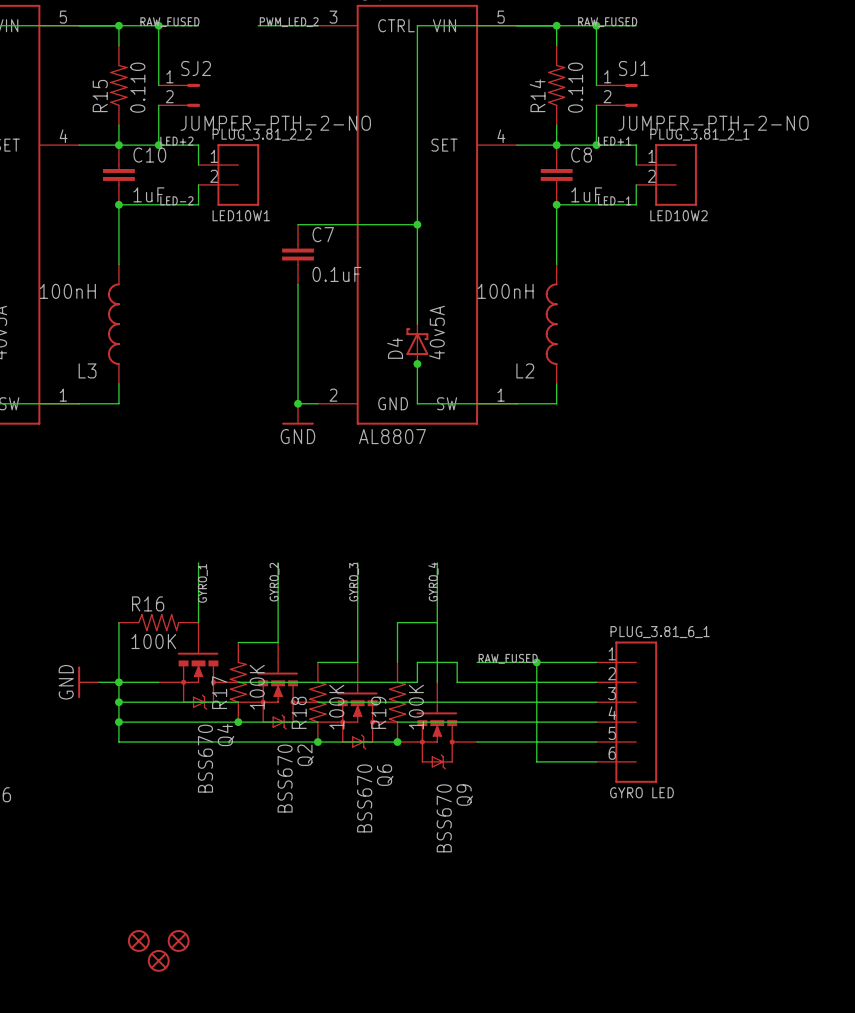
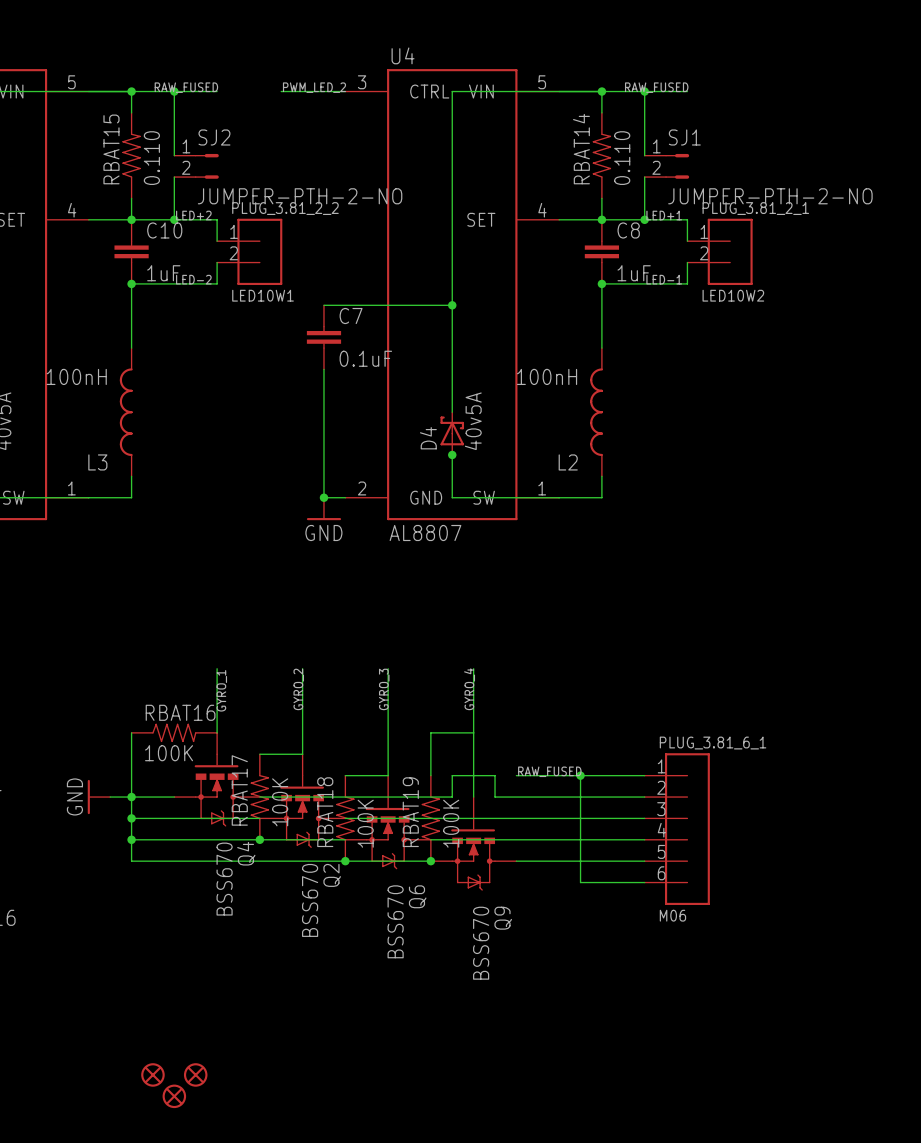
R14 name: R14 (537, 95) -> RBAT14 (581, 149)
R15 name: R15 (100, 96) -> RBAT15 (111, 149)
R16 name: R16 (148, 603) -> RBAT16 (180, 712)
R17 name: R17 (219, 692) -> RBAT17 (239, 790)
R18 name: R18 (299, 712) -> RBAT18 (325, 812)
R19 name: R19 (378, 712) -> RBAT19 (410, 812)
PLUG_3.81_6_1 value: GYRO LED (641, 792) -> M06 (672, 915)

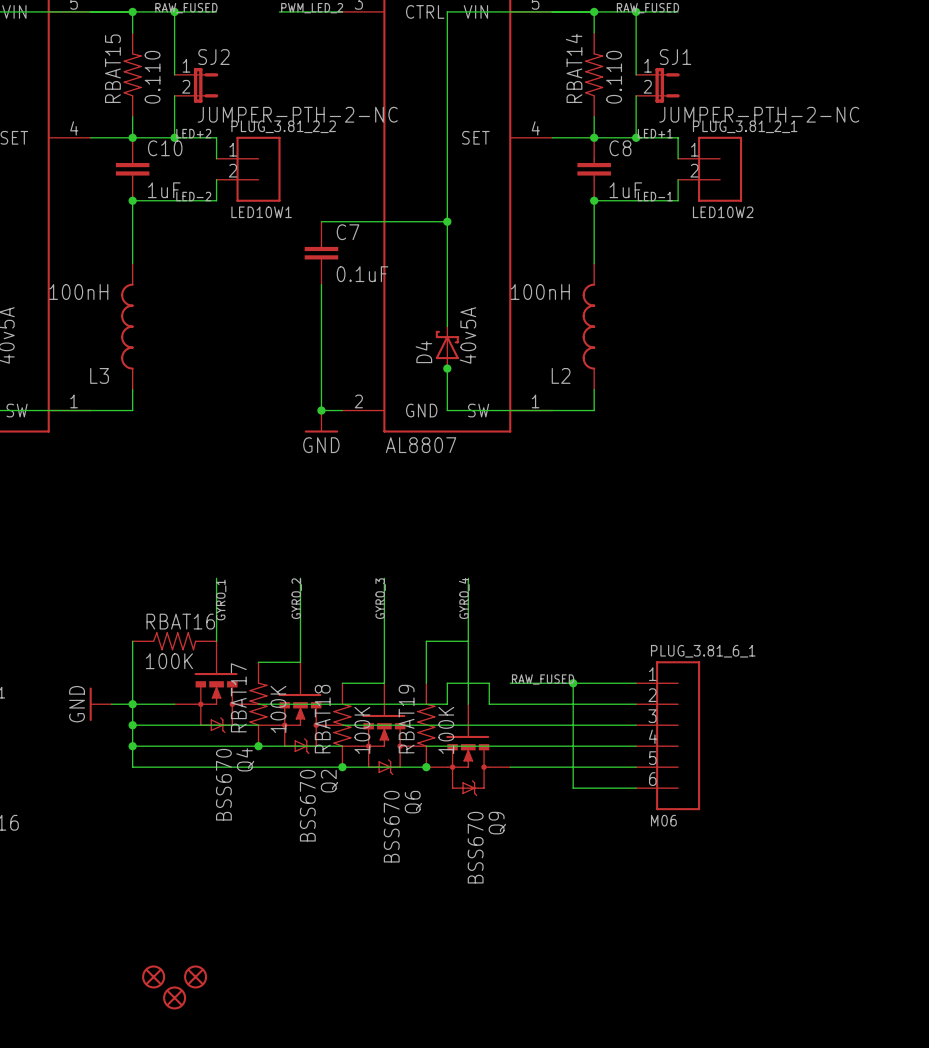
SJ2 symbol: [174, 153, 219, 179] -> [174, 67, 219, 103]
SJ1 symbol: [644, 153, 690, 179] -> [636, 67, 680, 103]
SJ2 value: JUMPER-PTH-2-NO (300, 196) -> JUMPER-PTH-2-NC (297, 114)
SJ1 value: JUMPER-PTH-2-NO (770, 196) -> JUMPER-PTH-2-NC (759, 114)

